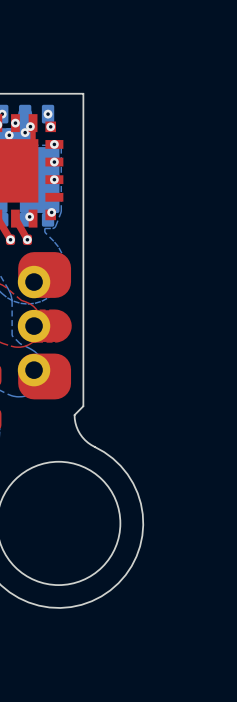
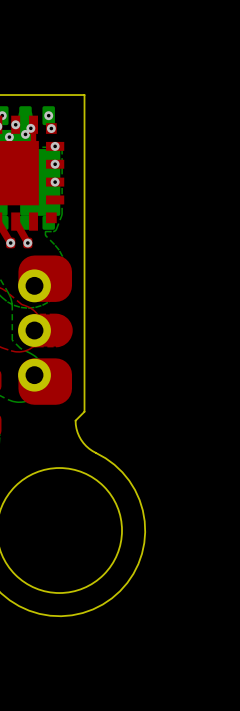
via: (51, 212) -> none
via: (29, 216) -> none

